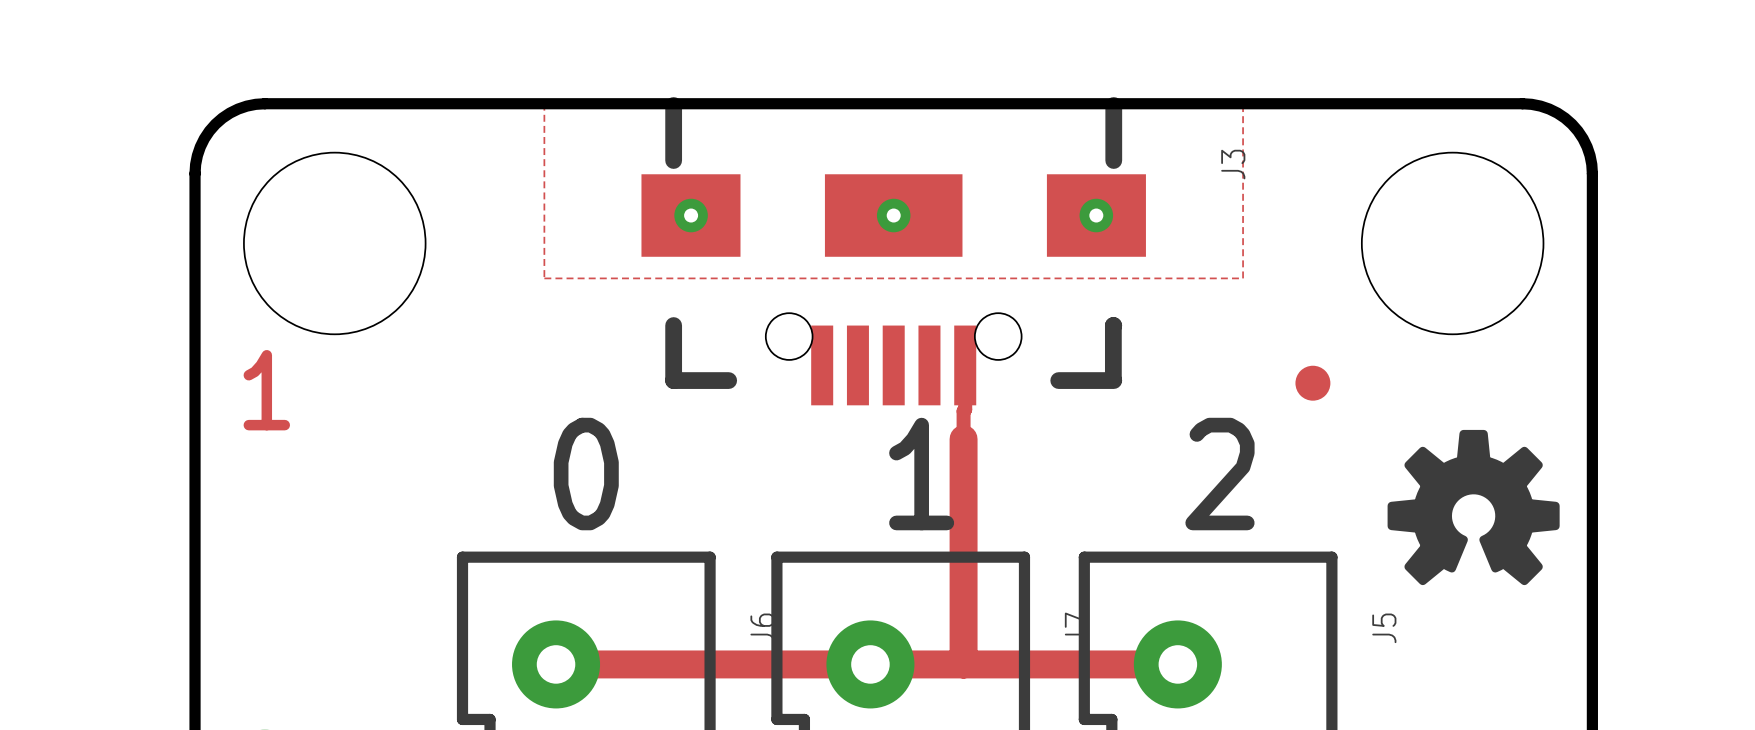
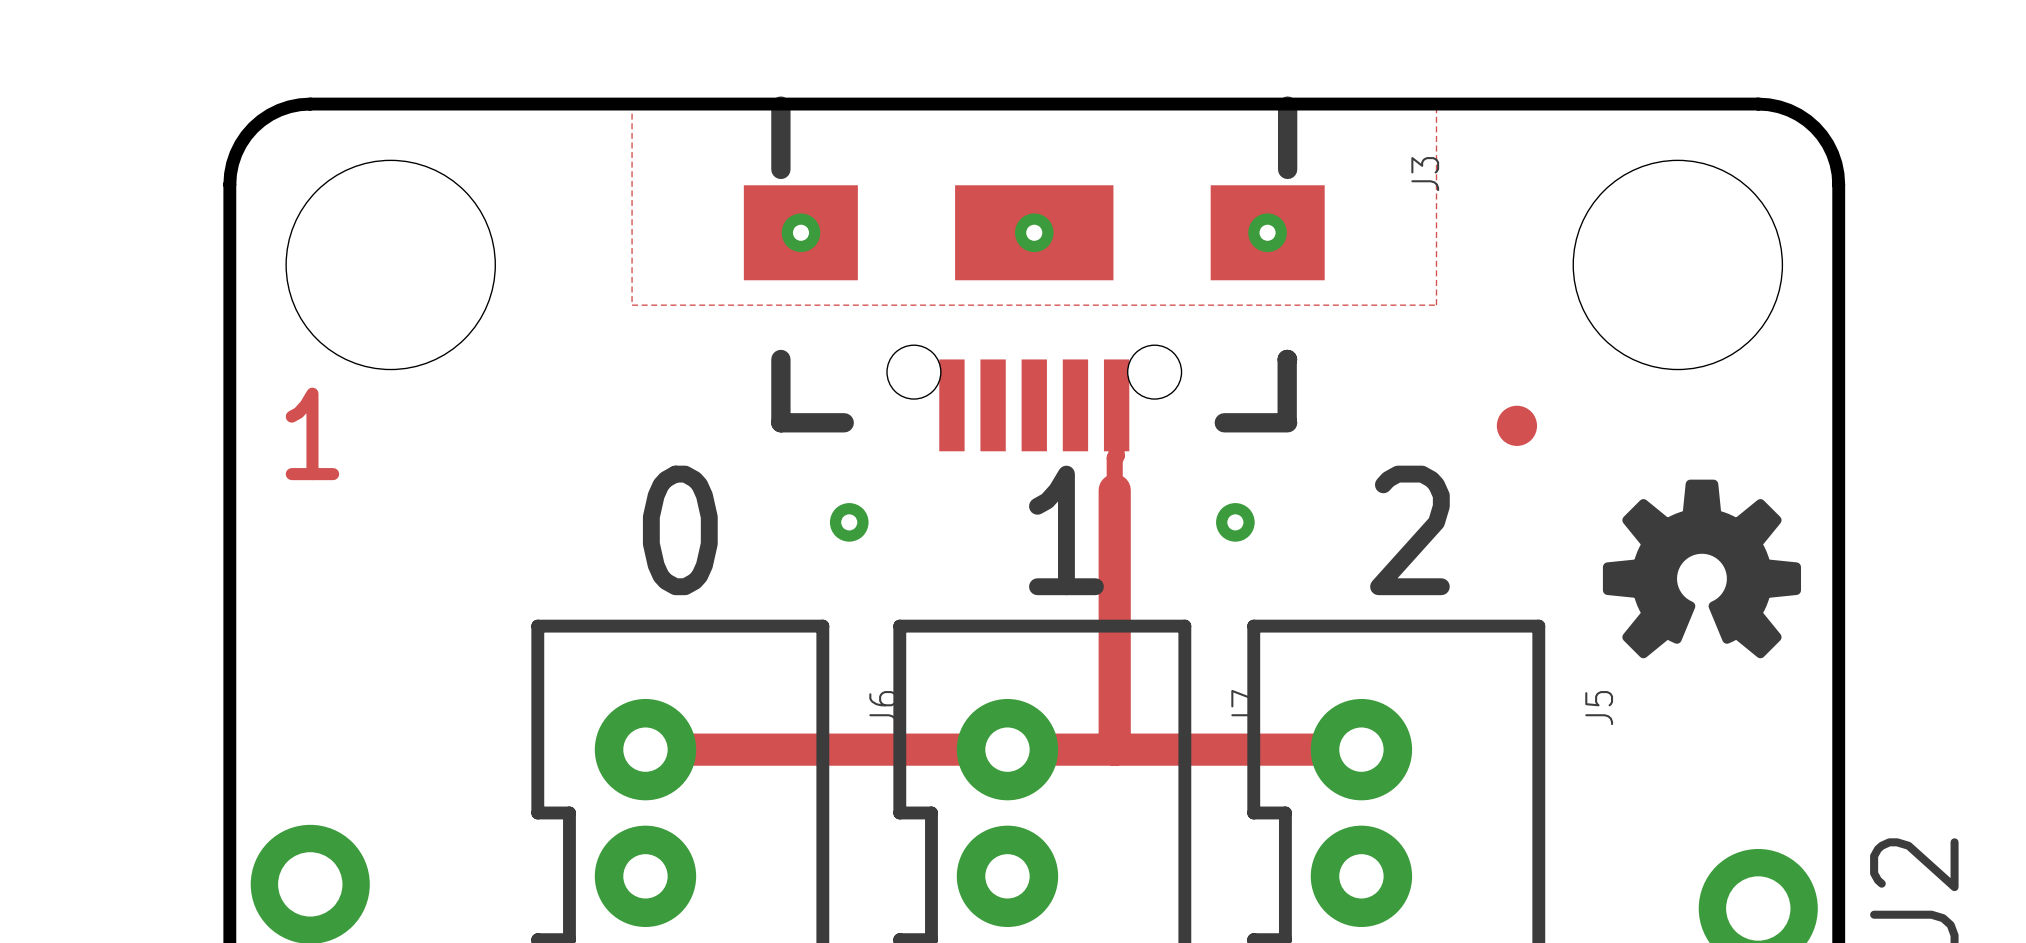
via: none -> (849, 522)
via: none -> (1235, 522)

